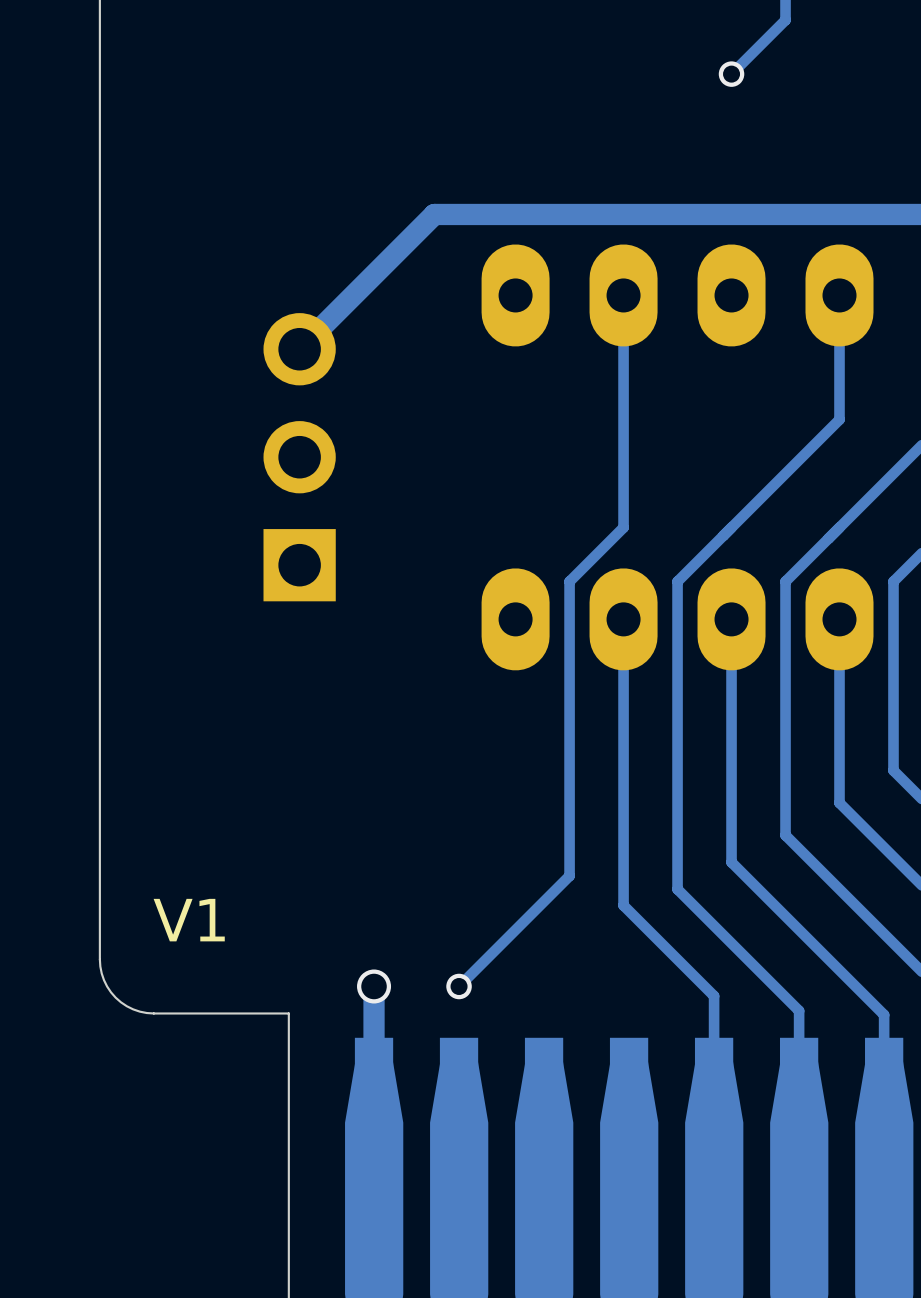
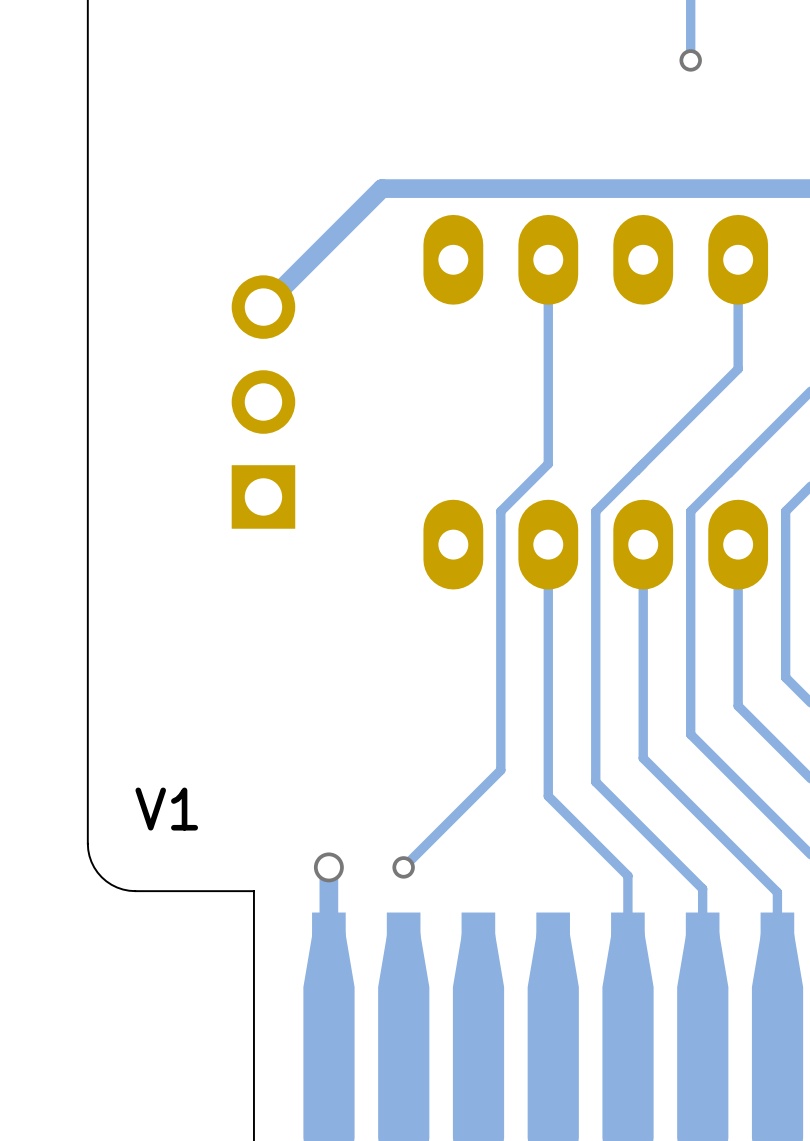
track: (785, 20) (731, 74) -> (690, 17) (690, 60)
via position: (731, 74) -> (690, 60)

